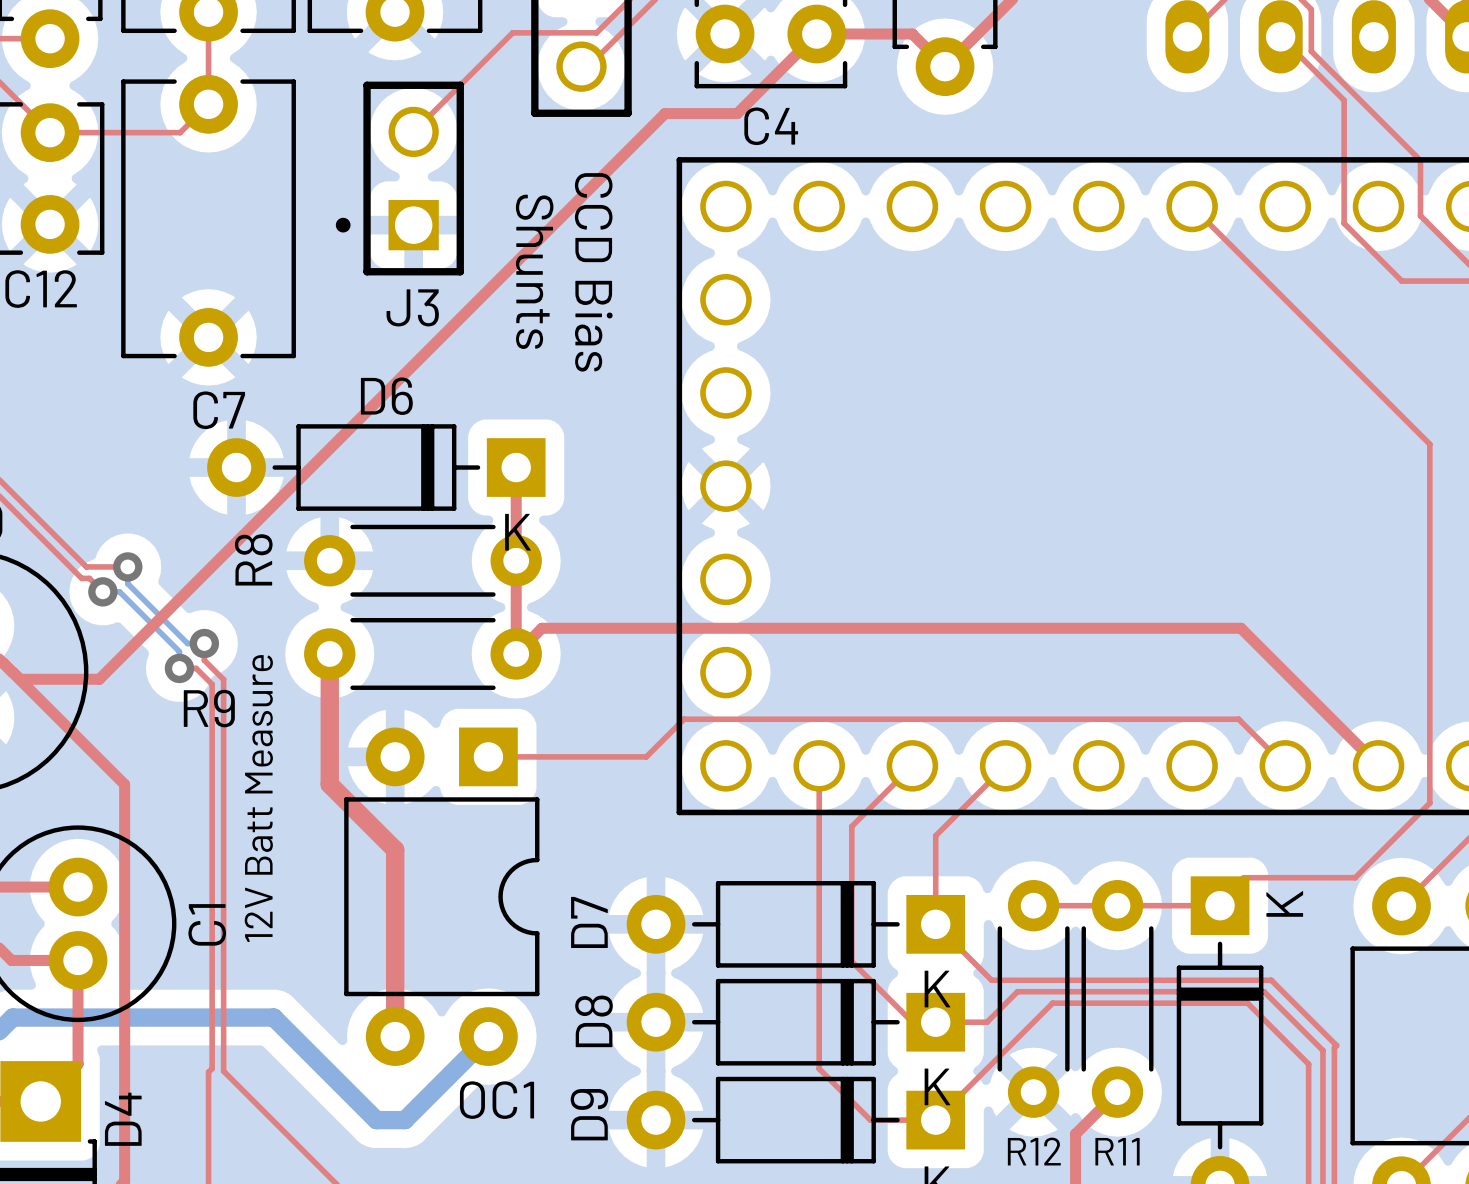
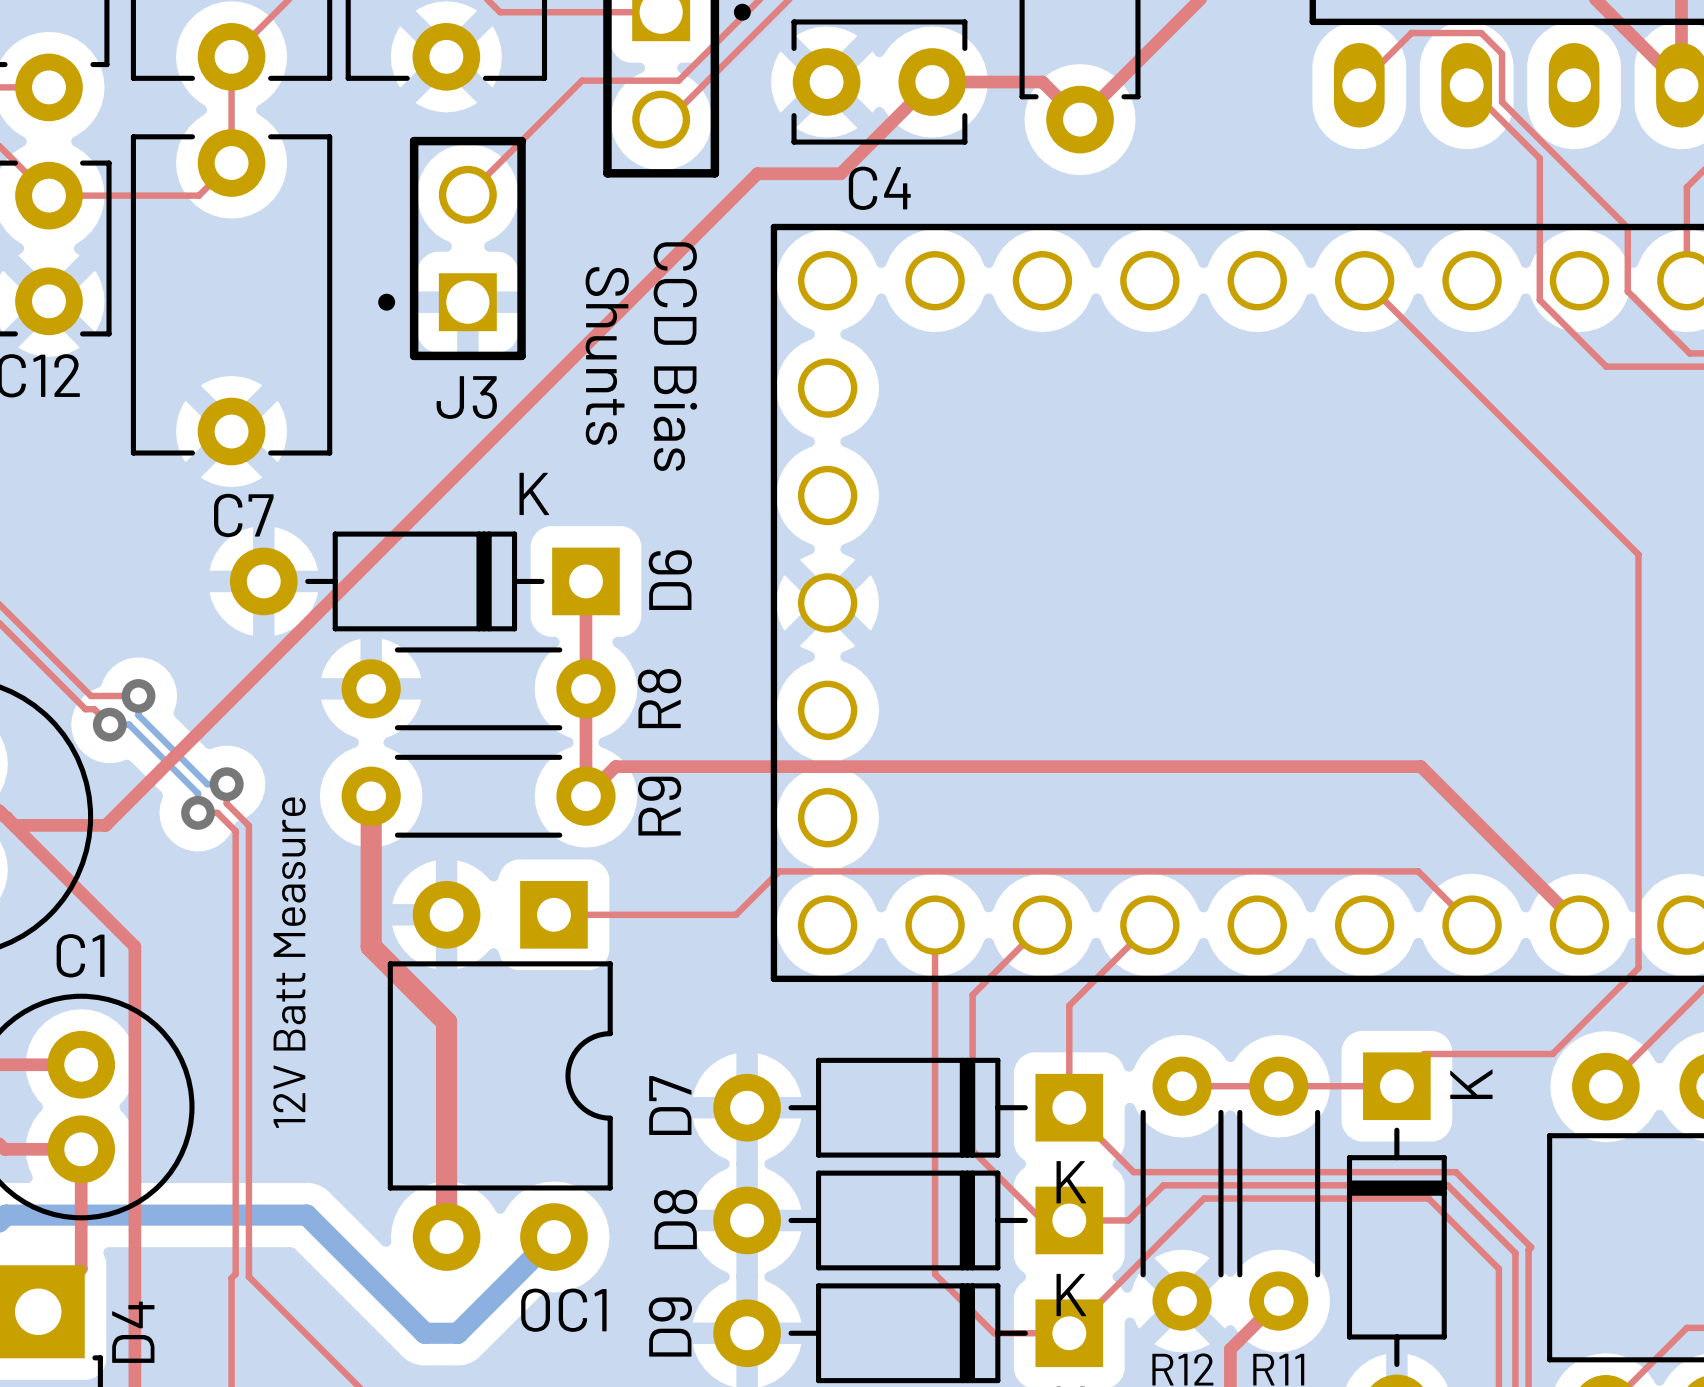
D6 name rotation: 0° (386, 396) -> 90° counterclockwise (670, 580)
D6 name position: D6 (386, 396) -> D6 (670, 580)
D6 text position: K (517, 532) -> K (534, 493)
R8 name position: R8 (253, 559) -> R8 (659, 698)
R9 name rotation: 0° (209, 708) -> 90° counterclockwise (659, 806)
R9 name position: R9 (209, 708) -> R9 (659, 806)
C1 name rotation: 0° (207, 924) -> 90° clockwise (80, 955)
C1 name position: C1 (207, 924) -> C1 (80, 955)

